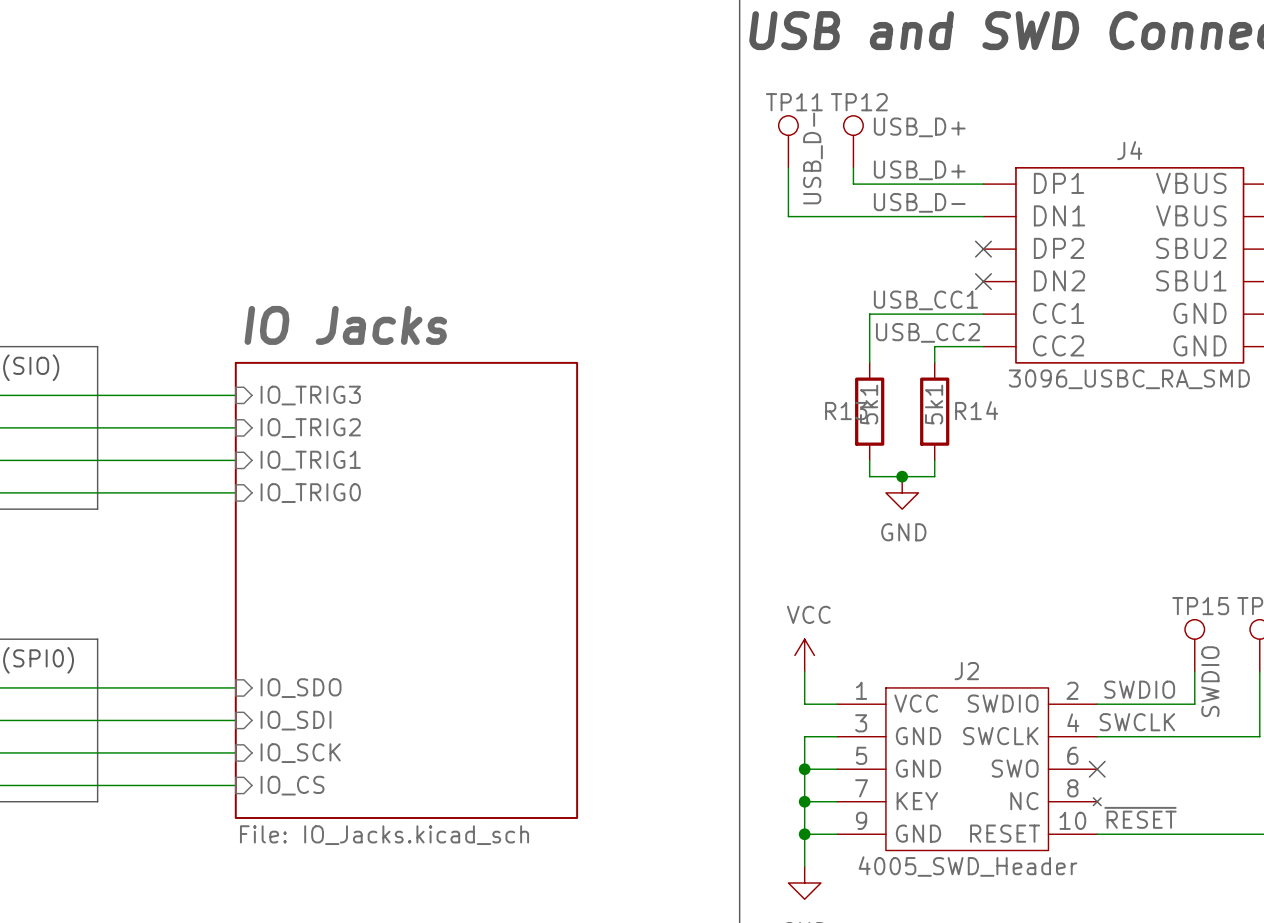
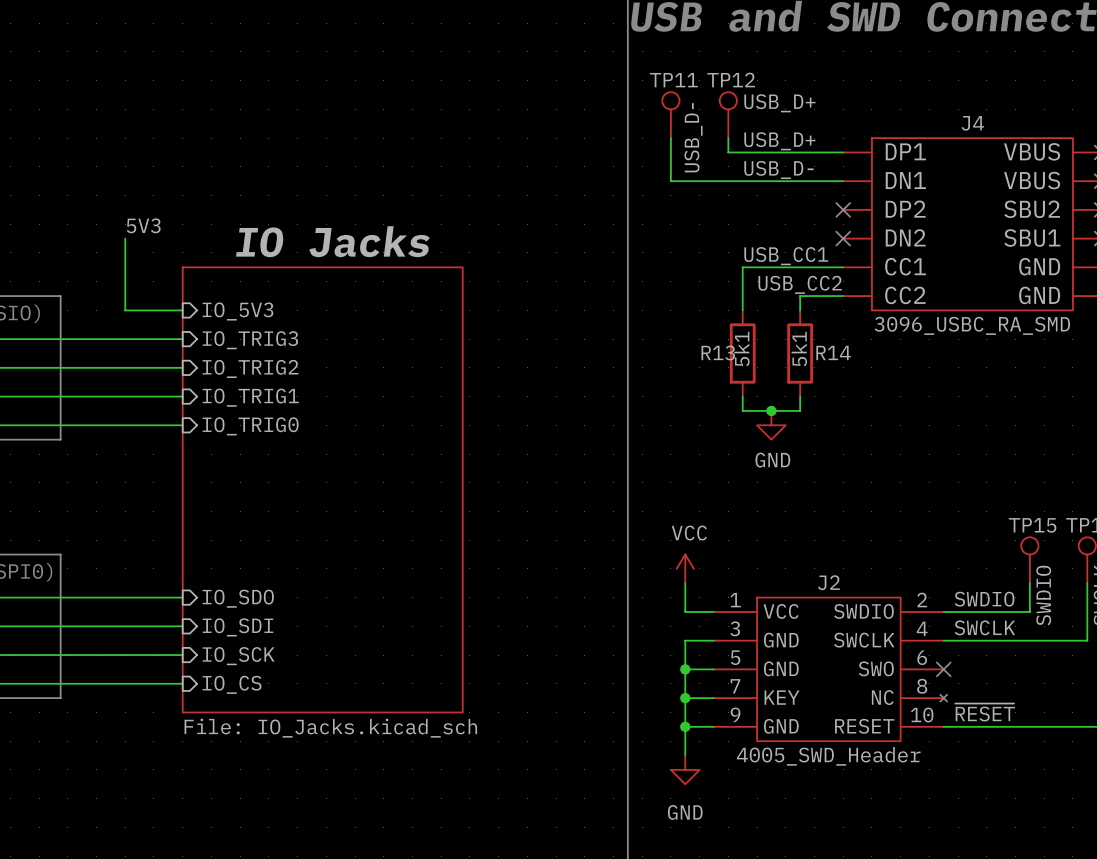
label: none -> 5V3 (143, 225)
wire: none -> (125, 238) (125, 310) (182, 310)
sheet pin: none -> IO_5V3 (237, 311)
sheet IO Jacks: none -> File: IO_Jacks.kicad_sch (322, 489)
sheet IO Jacks: File: IO_Jacks.kicad_sch (406, 590) -> none

